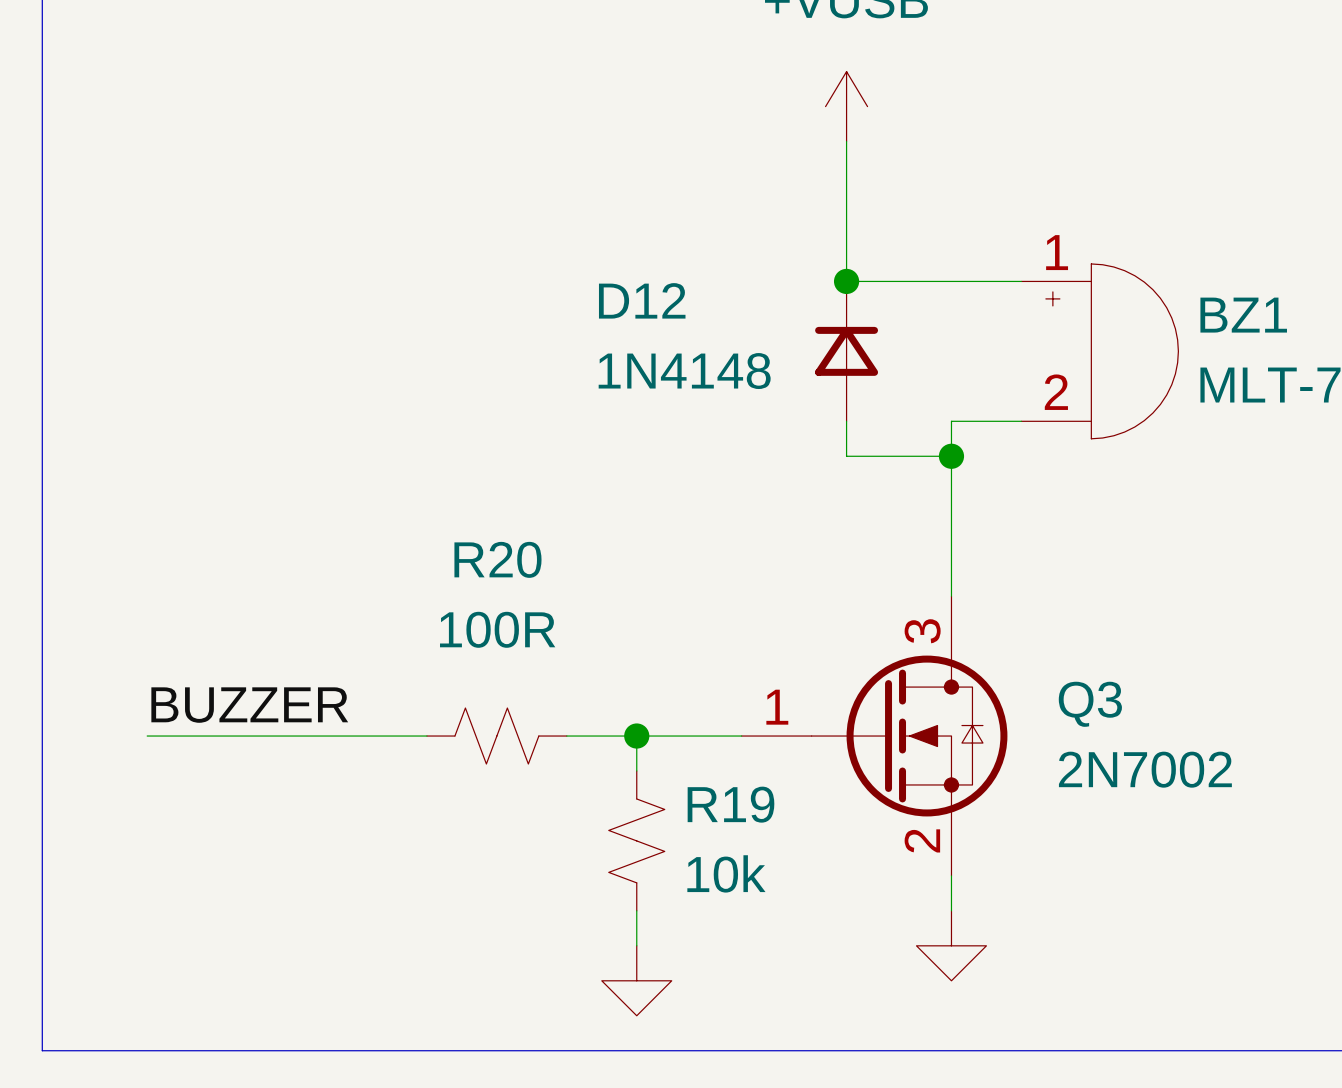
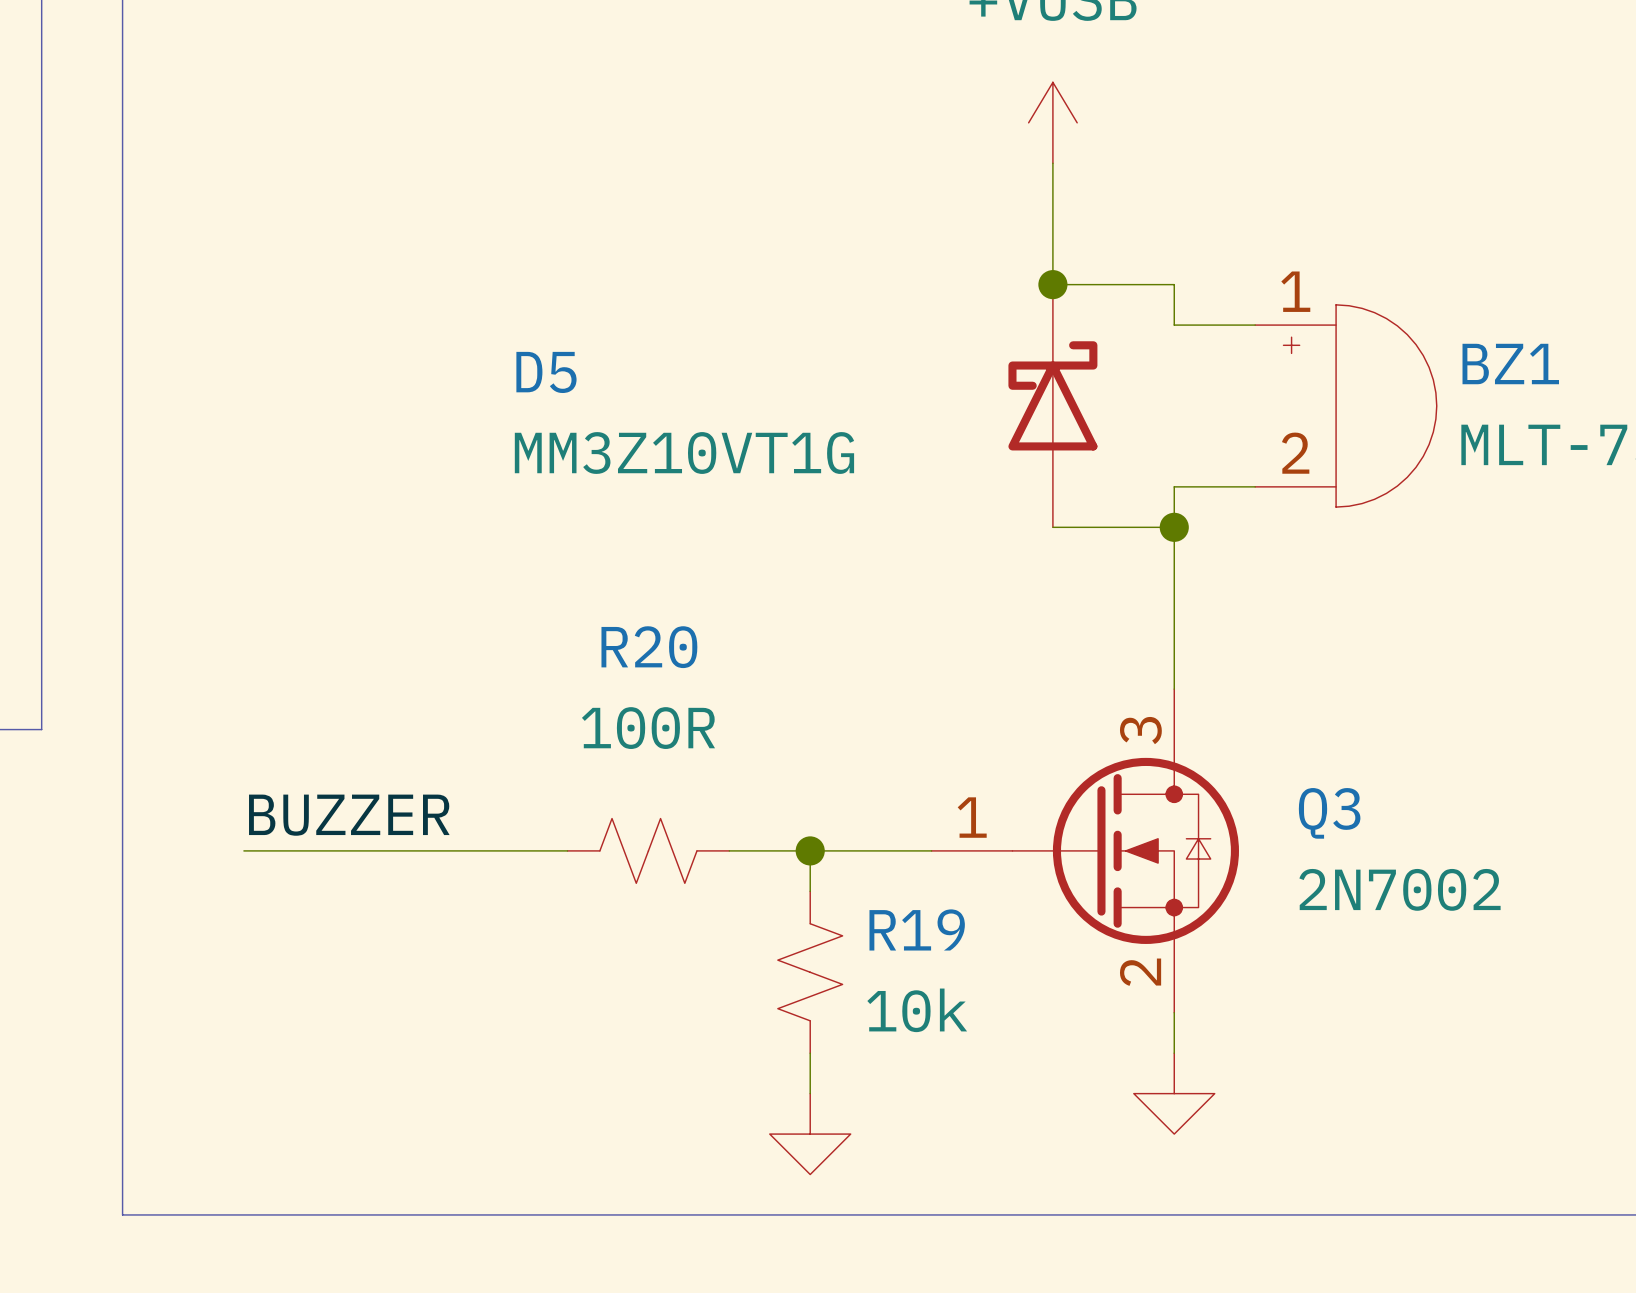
wire: (846, 246) (846, 281) (951, 281) -> (1052, 284) (1174, 284) (1174, 325)
junction position: (846, 281) -> (1052, 284)
D12: 1N4148 (846, 351) -> none
D5: none -> MM3Z10VT1G (1052, 405)

